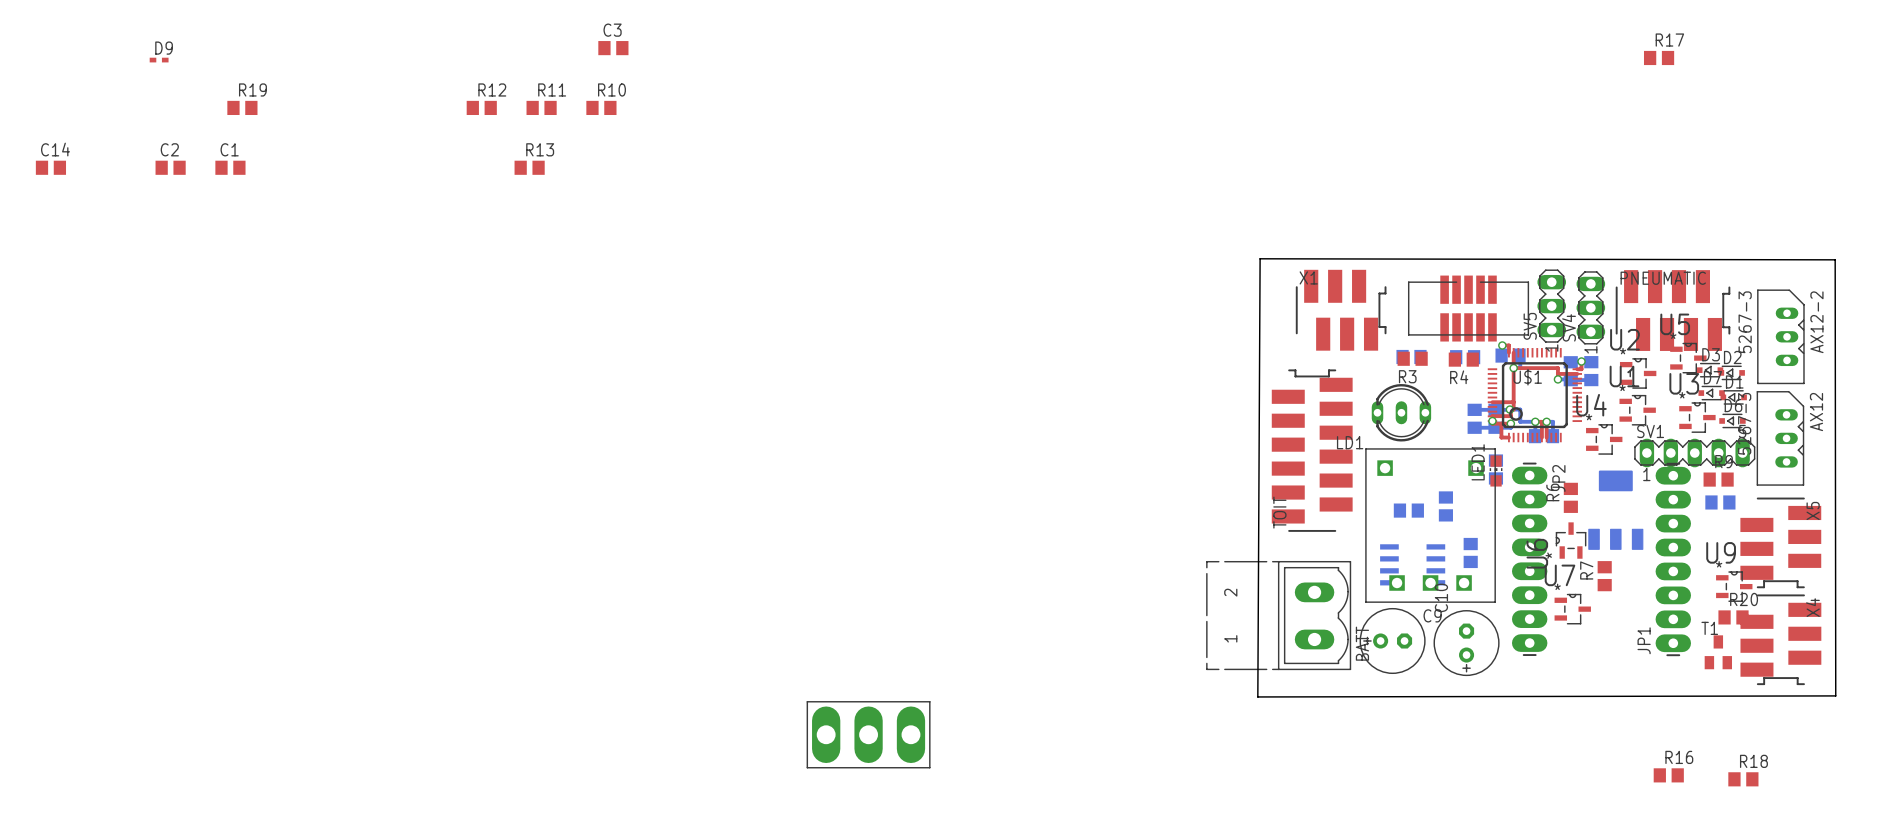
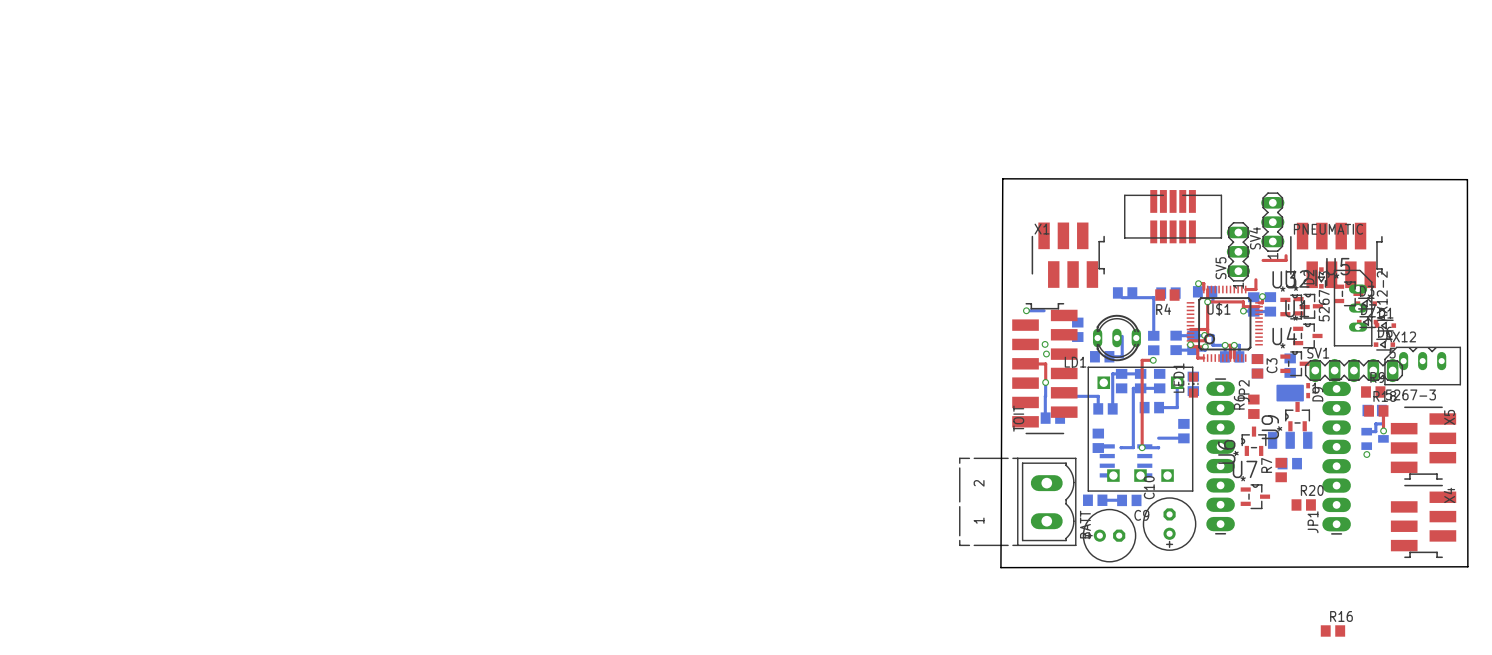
C3 rotation: 0° (613, 48) -> 90° clockwise (1257, 366)
C3 position: (613, 48) -> (1257, 366)
R17: (1659, 57) -> none
D9 rotation: 0° (159, 60) -> 90° clockwise (1308, 390)
D9 position: (159, 60) -> (1308, 390)
R19: (242, 107) -> none
R12: (481, 107) -> none
R11: (541, 107) -> none
R10: (601, 107) -> none
C14: (50, 167) -> none
C2: (170, 167) -> none
C1: (230, 167) -> none
R13: (529, 167) -> none
SV4 position: (1590, 307) -> (1272, 222)
part position: (1468, 308) -> (1173, 216)
top track: none -> (1286, 255) (1286, 260) (1263, 260)
AX12-2 position: (1780, 336) -> (1353, 308)
top track: none -> (1255, 279) (1255, 289) (1245, 289)
R3 side: top (1412, 358) -> bottom (1077, 329)
bottom track: none -> (1122, 297) (1153, 297) (1153, 335)
D2 rotation: 0° (1731, 372) -> 90° counterclockwise (1321, 277)
D2 position: (1731, 372) -> (1321, 277)
bottom track: none -> (1026, 310) (1044, 310)
via: none -> (1026, 310)
bottom track: none -> (1122, 336) (1122, 356) (1109, 356)
U3 position: (1697, 417) -> (1295, 307)
part: none -> (1153, 343)
via: none -> (1045, 344)
via: none -> (1046, 354)
part: none -> (1102, 356)
AX12 rotation: 0° (1780, 438) -> 90° counterclockwise (1422, 366)
U4 position: (1604, 439) -> (1295, 363)
top track: none -> (1153, 360) (1142, 360) (1142, 447)
via: none -> (1153, 360)
top track: none -> (1025, 363) (1045, 363) (1045, 382)
part: none -> (1290, 365)
bottom track: none -> (1140, 373) (1112, 373) (1112, 408)
part: none -> (1121, 381)
part: none -> (1140, 381)
part: none -> (1159, 381)
bottom track: none -> (1045, 382) (1045, 418)
via: none -> (1045, 382)
bottom track: none -> (1177, 382) (1177, 407) (1159, 407)
bottom track: none -> (1159, 388) (1133, 388) (1133, 447) (1121, 447)
bottom track: none -> (1059, 396) (1098, 396) (1098, 408)
part: none -> (1105, 408)
top track: none -> (1383, 410) (1383, 430)
bottom track: none -> (1383, 411) (1383, 423) (1375, 423) (1375, 431) (1366, 431)
part rotation: 0° (1445, 506) -> 90° clockwise (1151, 407)
part: (1408, 510) -> none
part: none -> (1052, 418)
via: none -> (1383, 430)
bottom track: none -> (1158, 438) (1183, 438)
part: none -> (1098, 440)
bottom track: none -> (1142, 447) (1158, 447)
via: none -> (1142, 447)
part position: (1470, 552) -> (1183, 431)
via: none -> (1366, 454)
part: none -> (1289, 463)
U9 rotation: 0° (1734, 586) -> 90° counterclockwise (1297, 416)
U9 position: (1734, 586) -> (1297, 416)
part: none -> (1095, 500)
bottom track: none -> (1102, 500) (1122, 500)
part: none -> (1129, 500)
R20 position: (1733, 617) -> (1303, 504)
C9 position: (1392, 640) -> (1109, 535)
T1 side: top (1718, 652) -> bottom (1375, 438)
board edge: (1835, 695) (1835, 259) (1260, 258) (1257, 696) -> (1467, 566) (1467, 179) (1002, 178) (1000, 567)
part: (868, 734) -> none
R18 position: (1743, 779) -> (1376, 410)

